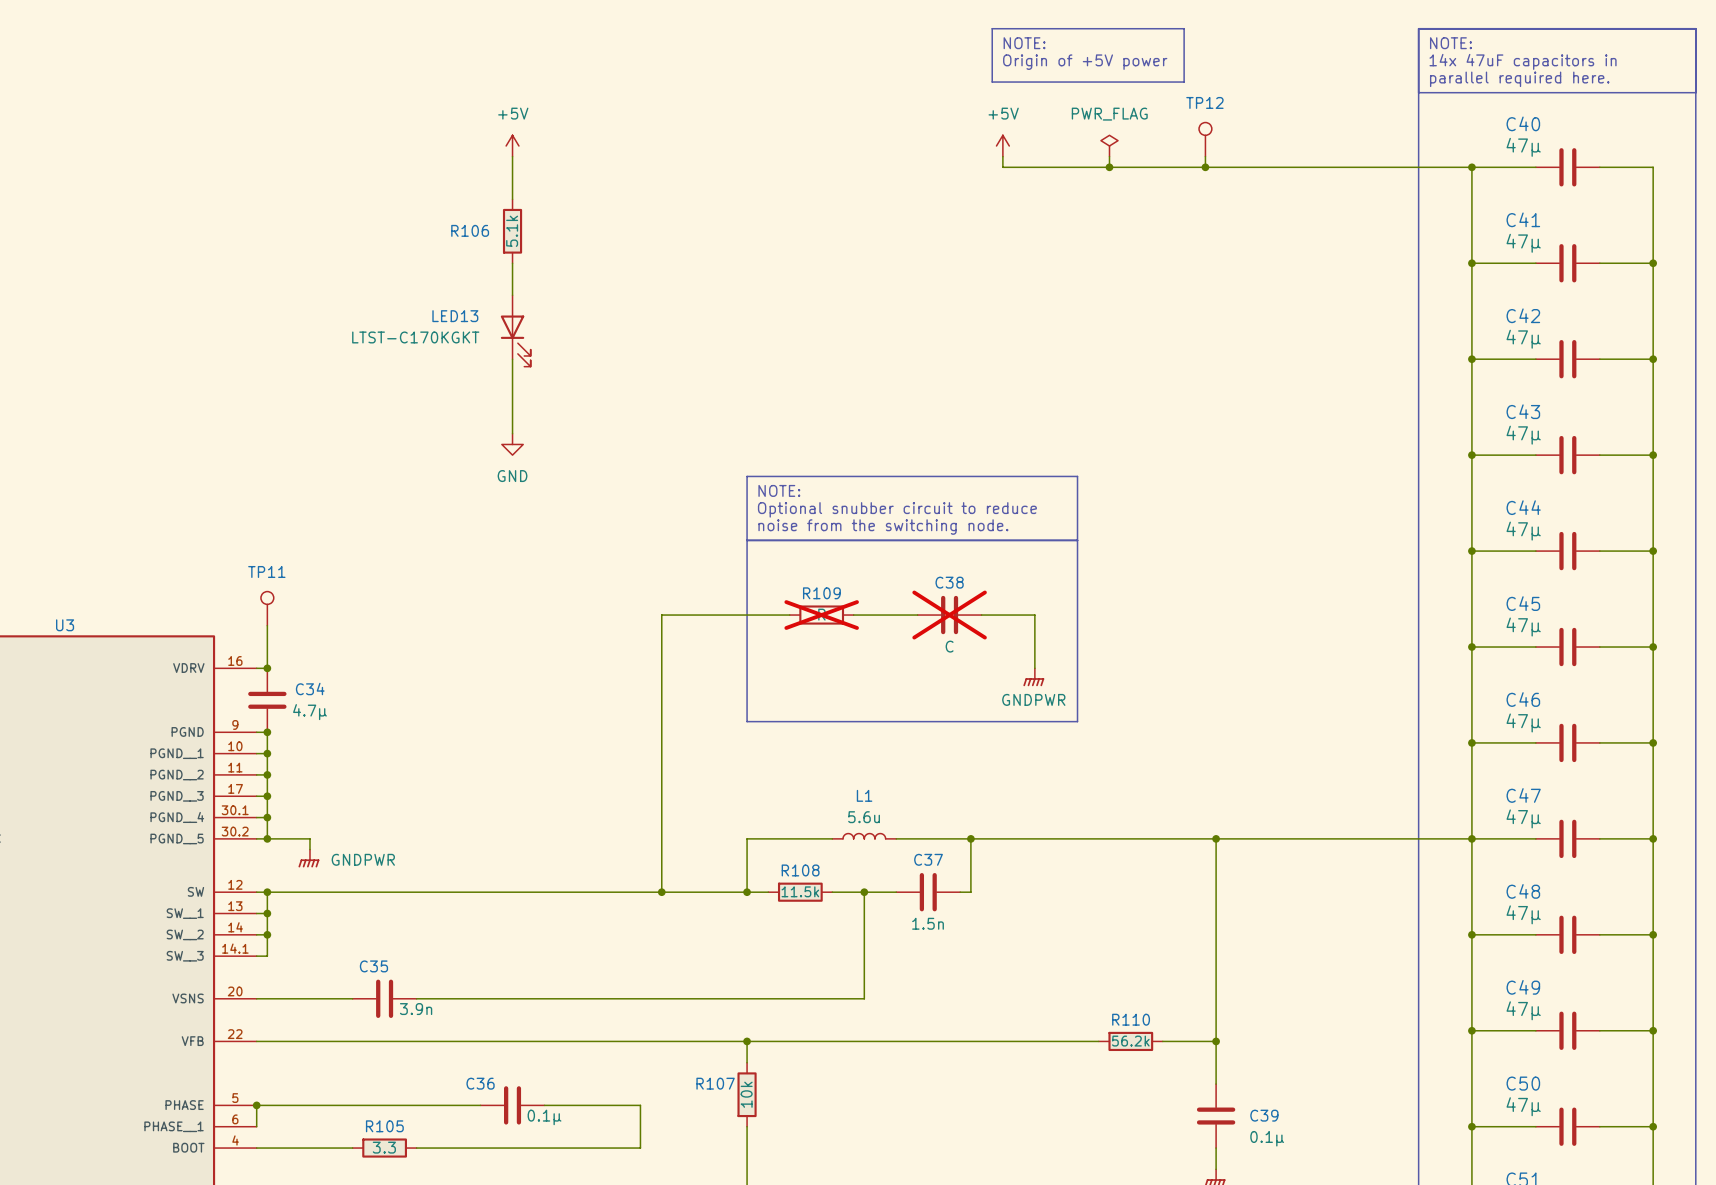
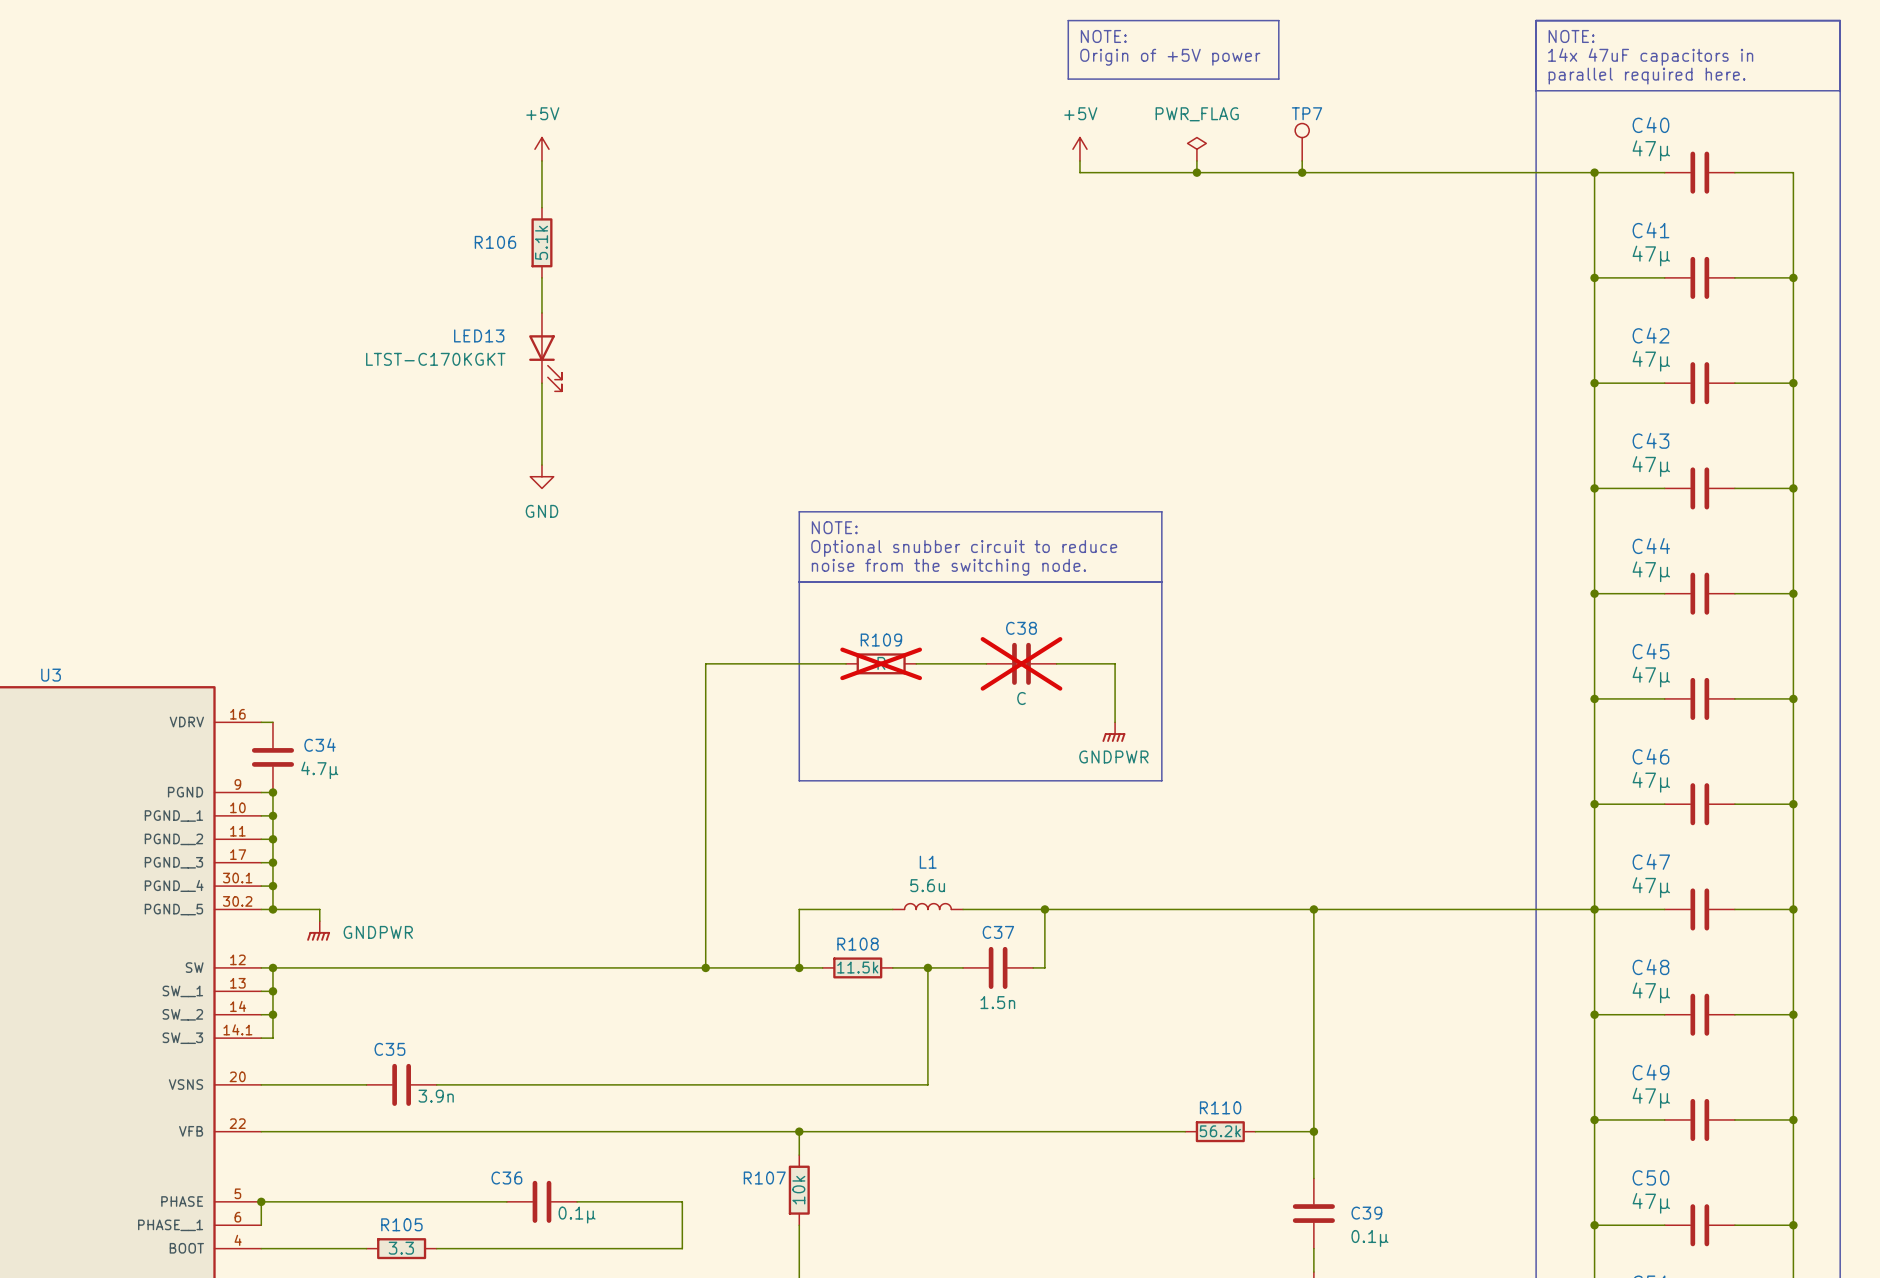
TP12 name: TP12 (1204, 102) -> TP7 (1307, 113)
TP11: (267, 608) -> none
wire: (267, 625) (267, 668) -> none
junction: (267, 668) -> none

